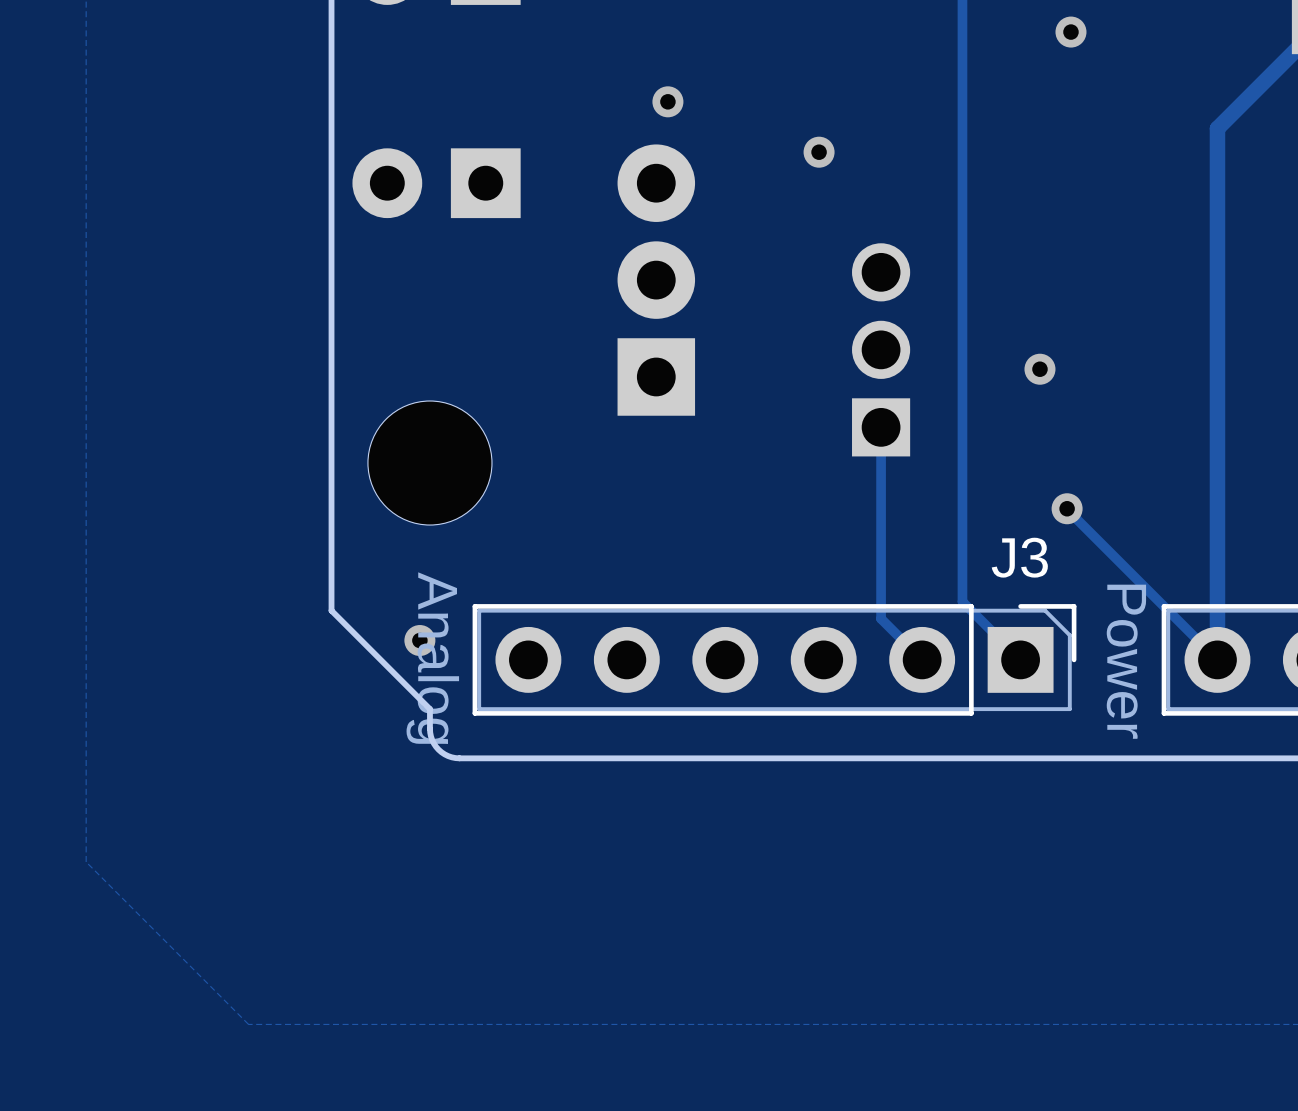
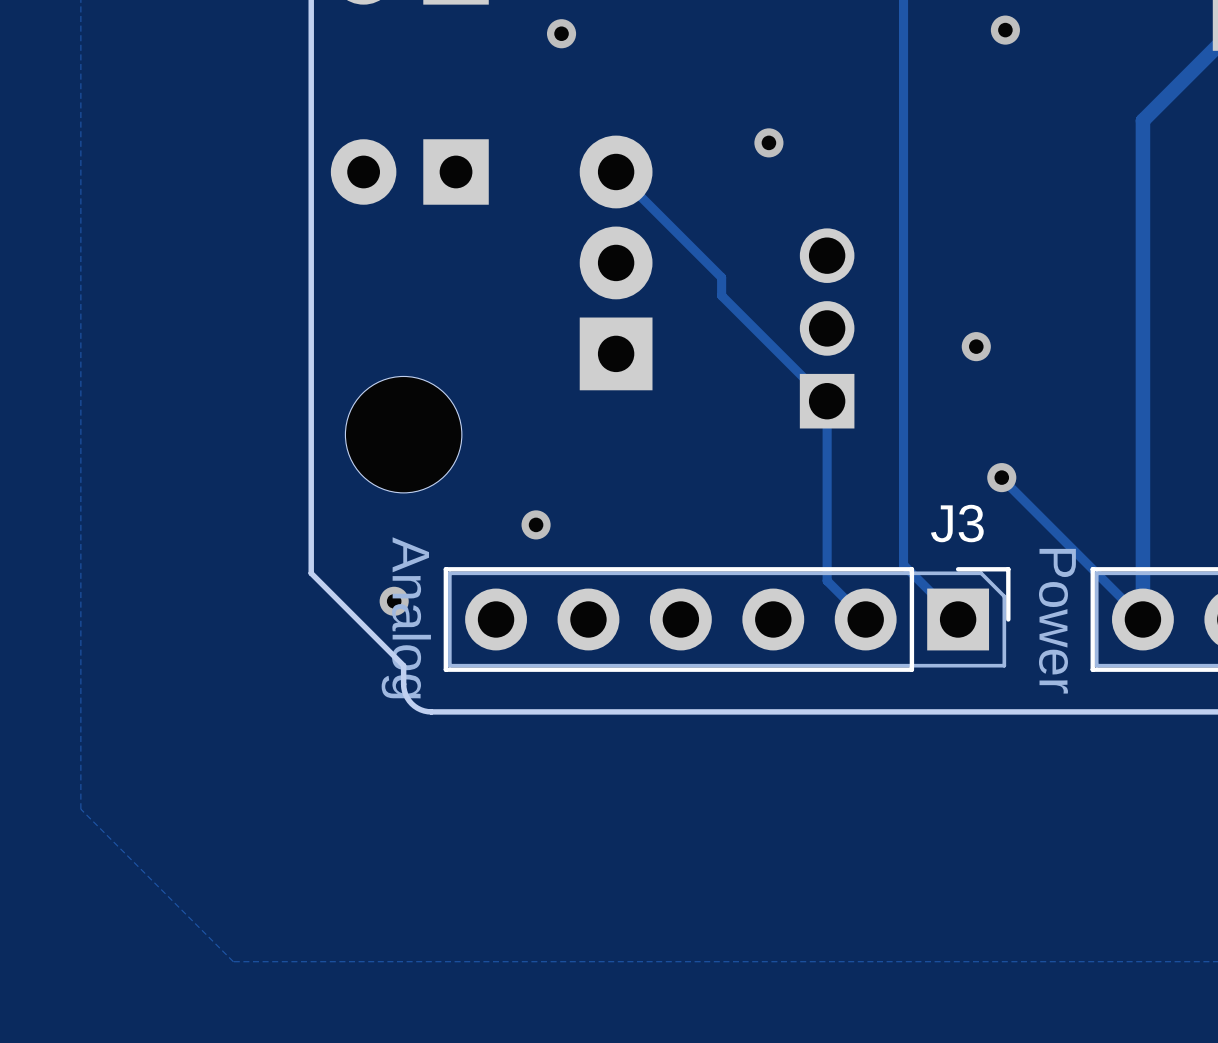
via position: (667, 101) -> (561, 33)
track: none -> (616, 171) (721, 277) (721, 295) (827, 401)
via: none -> (536, 524)

